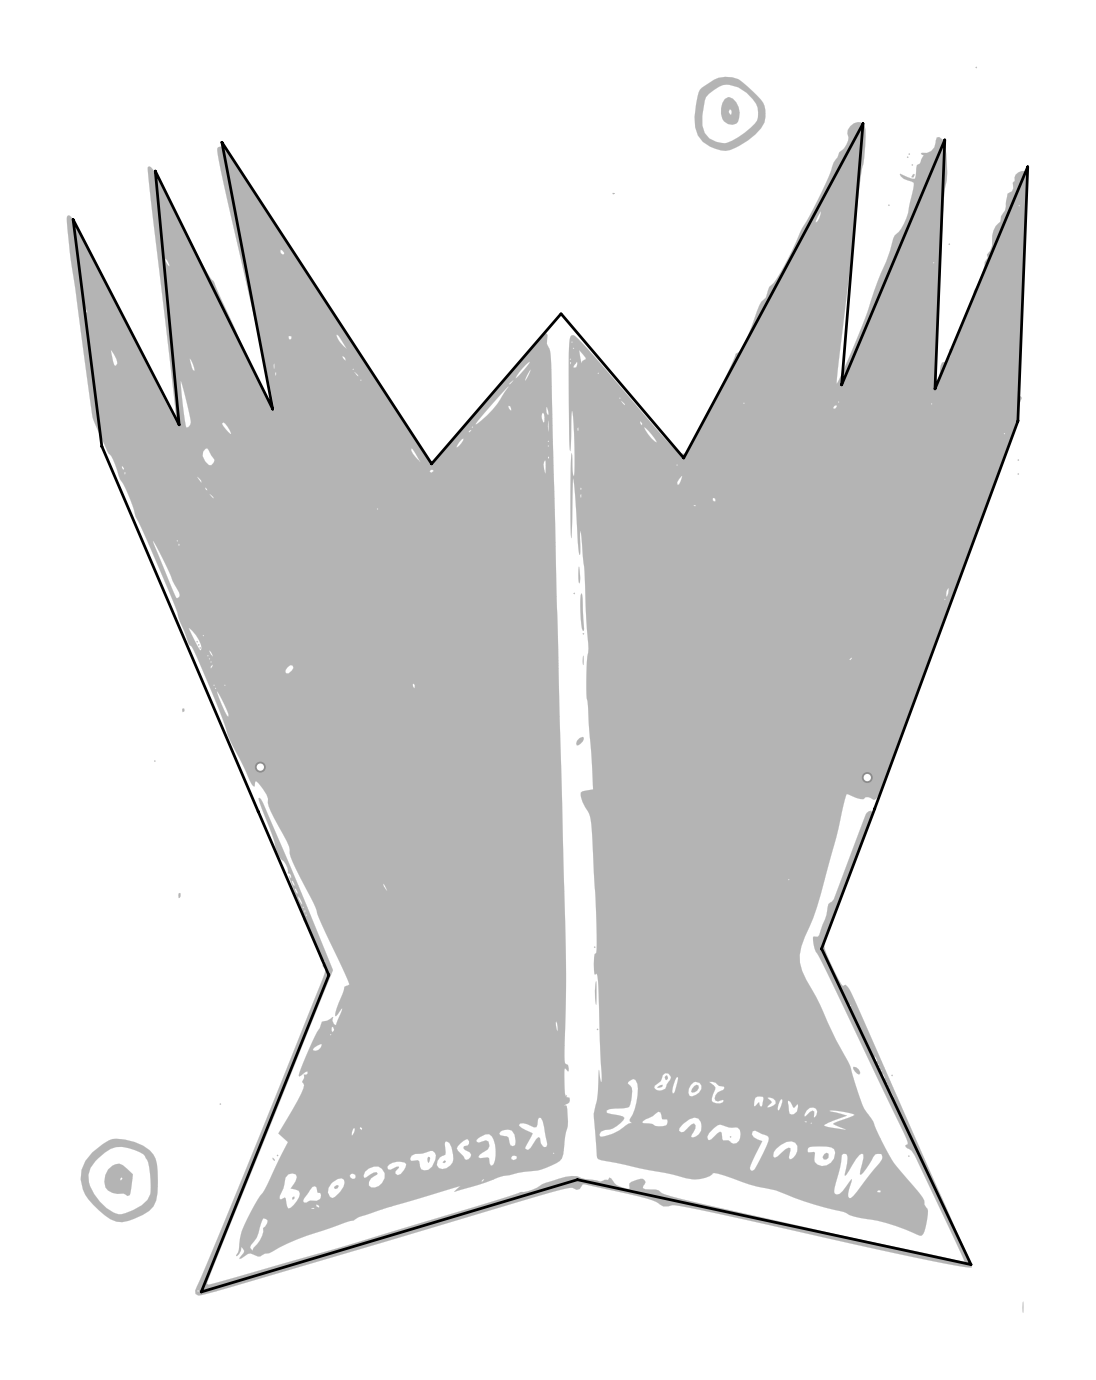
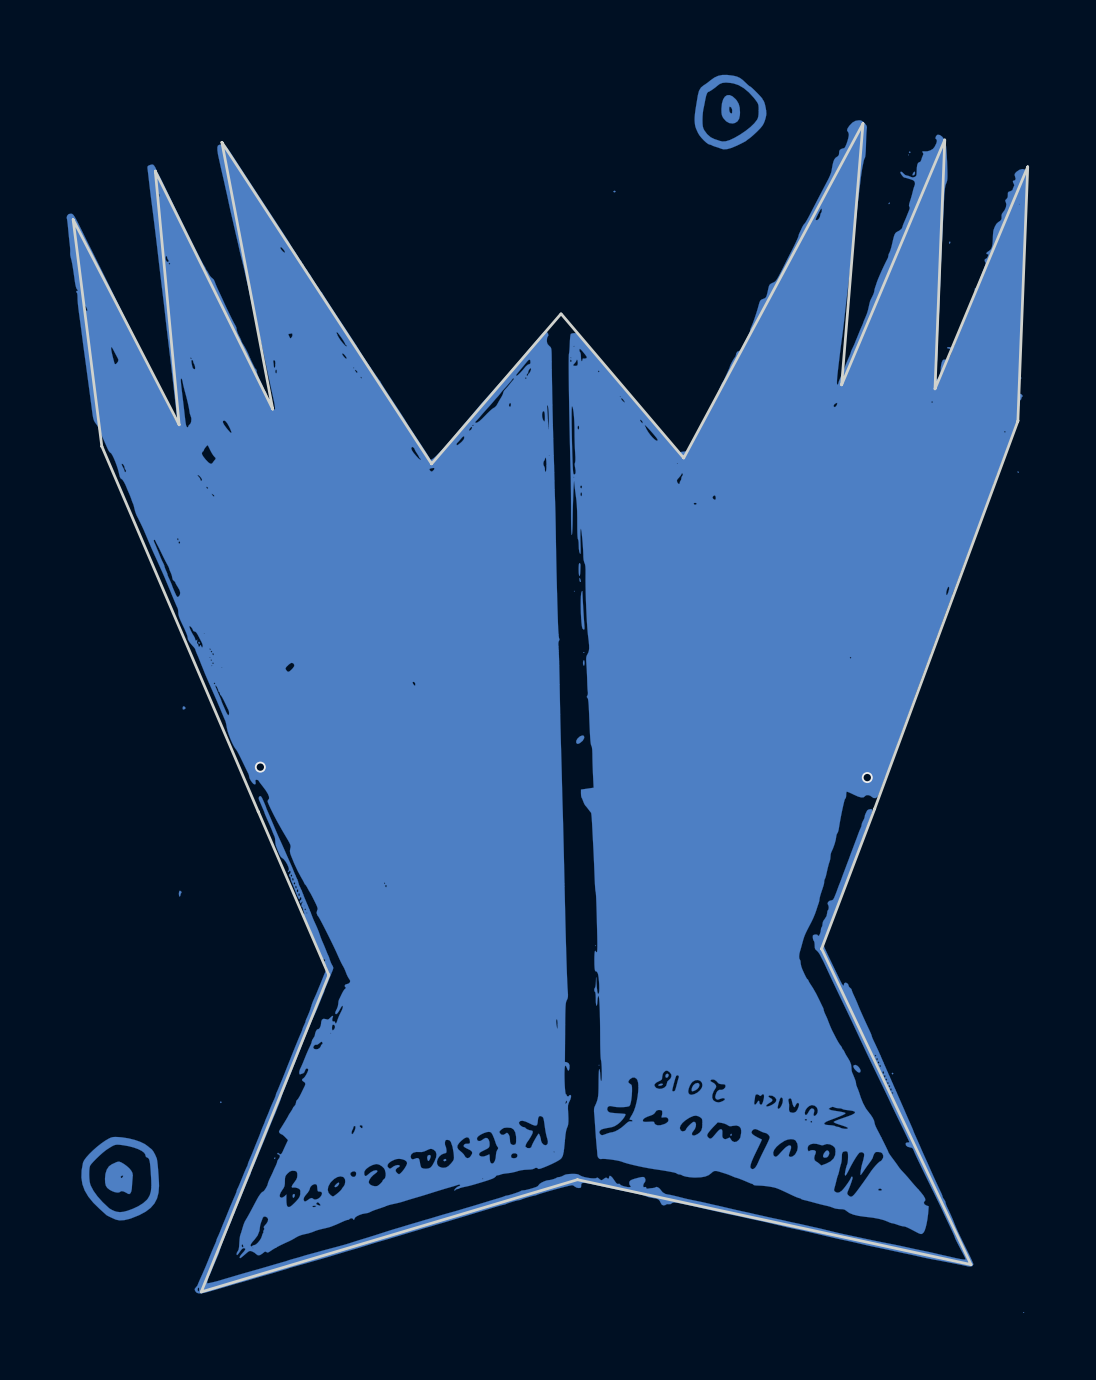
drawing shape: [66, 66, 1028, 1314] -> [66, 74, 1028, 1313]

